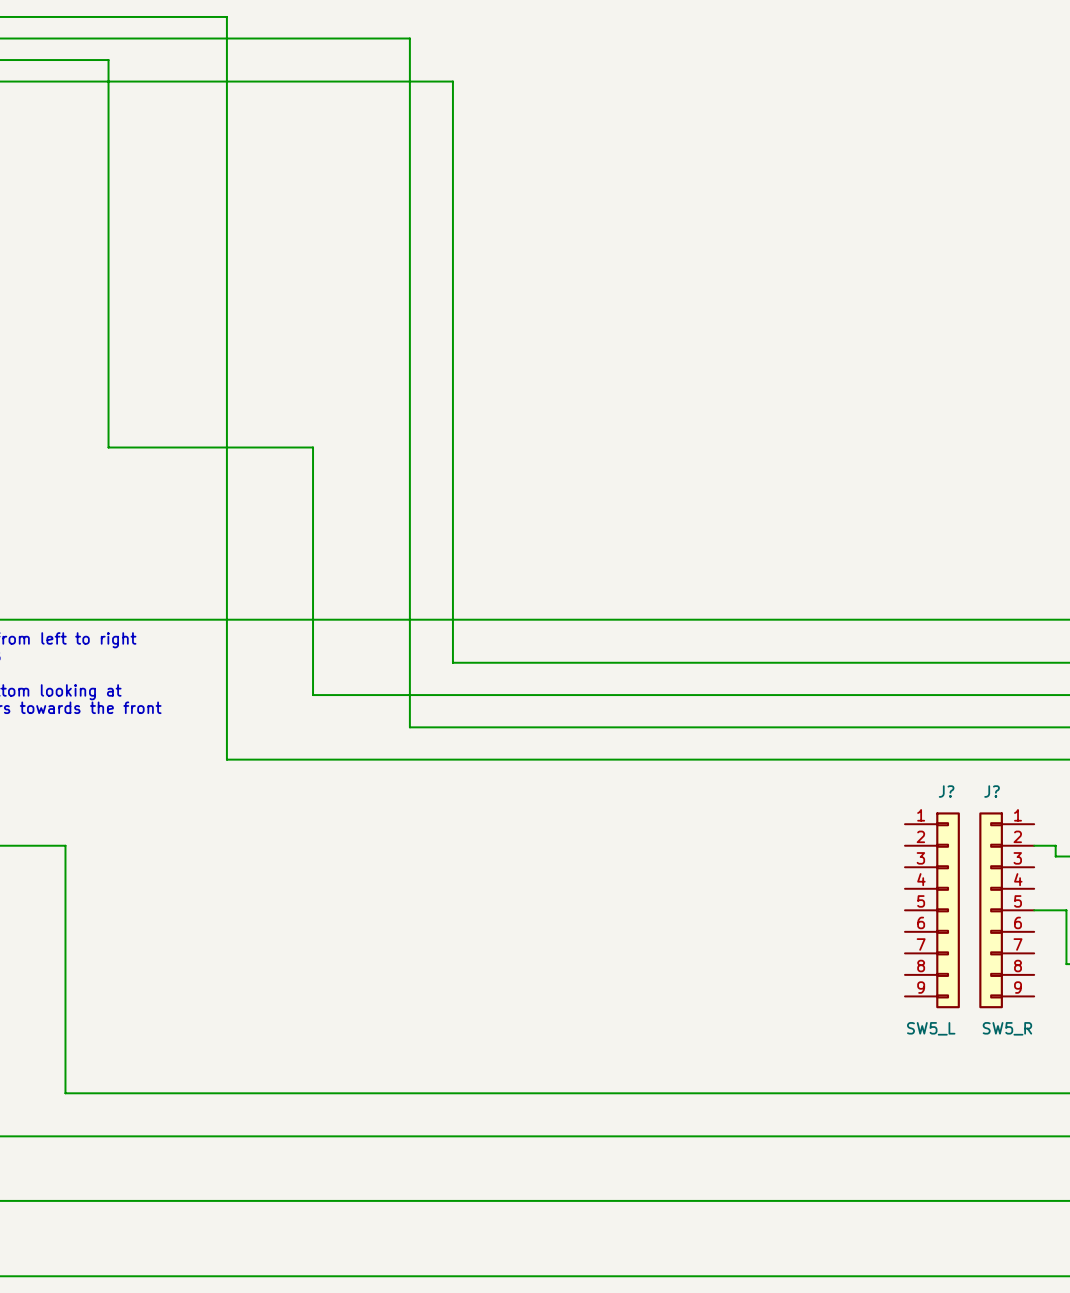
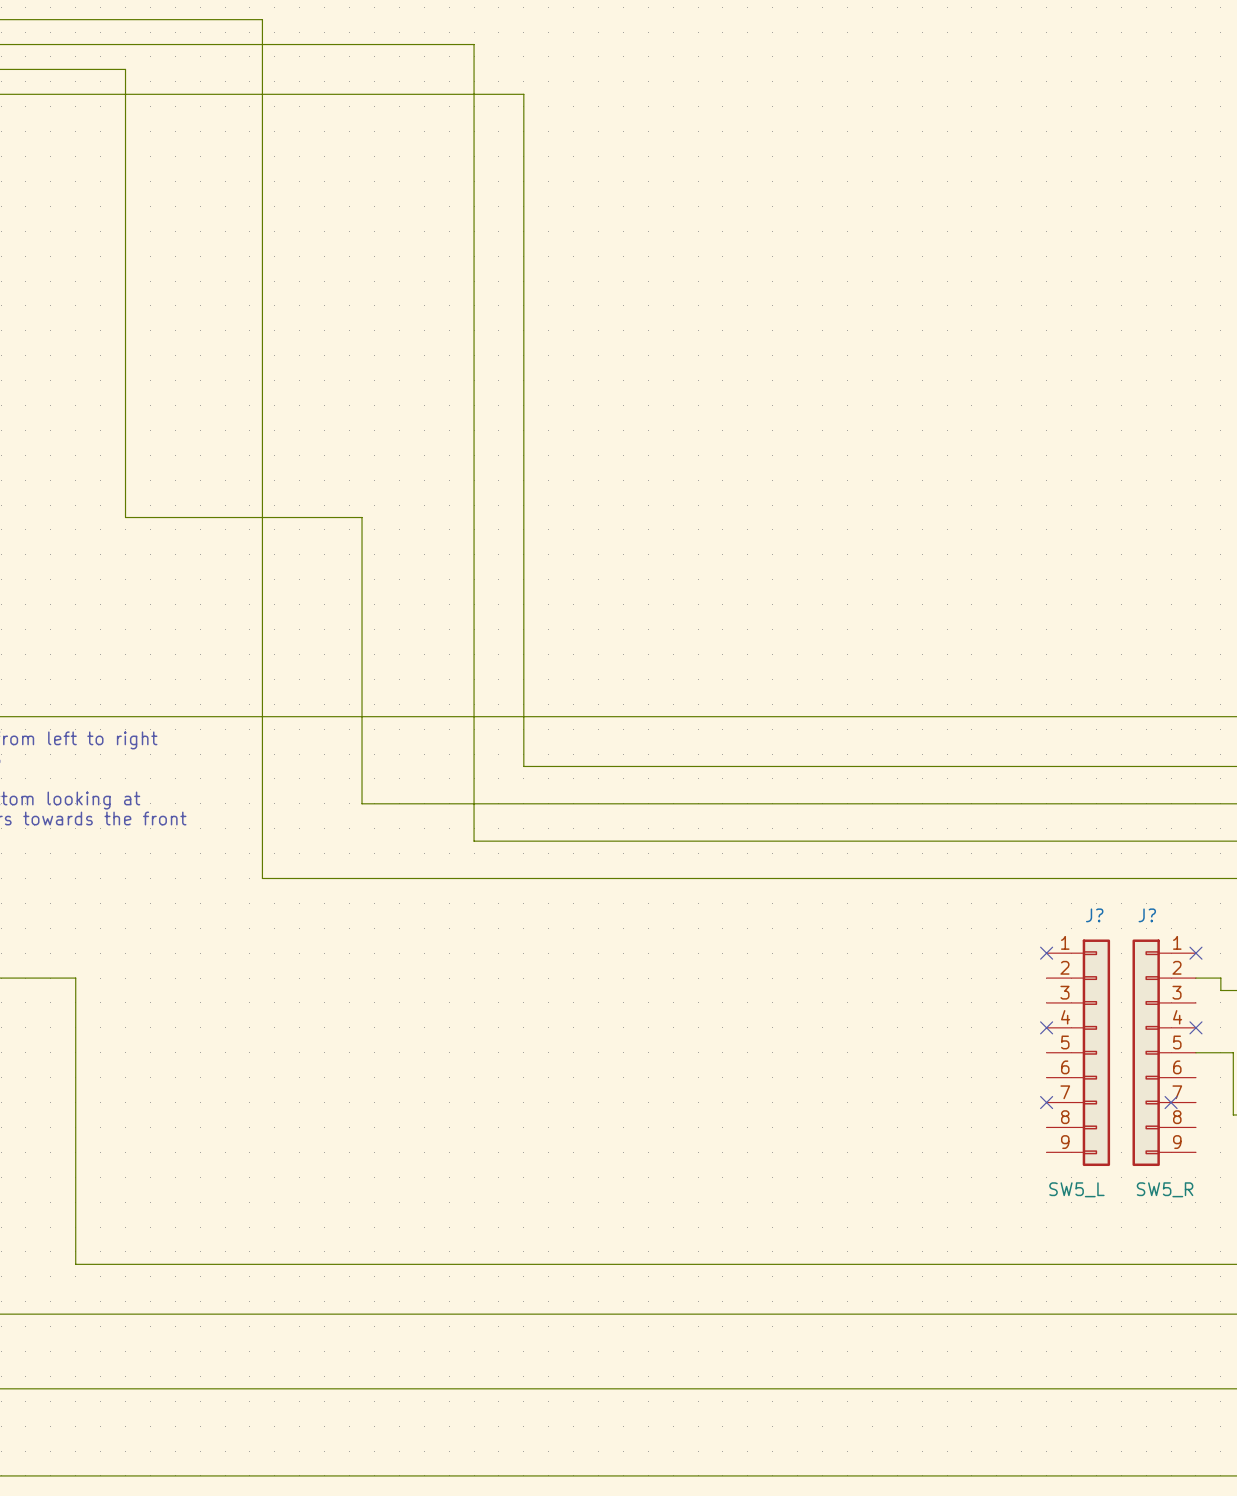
no-connect mark: none -> (1046, 953)
no-connect mark: none -> (1195, 953)
no-connect mark: none -> (1046, 1027)
no-connect mark: none -> (1195, 1027)
no-connect mark: none -> (1046, 1102)
no-connect mark: none -> (1171, 1102)

